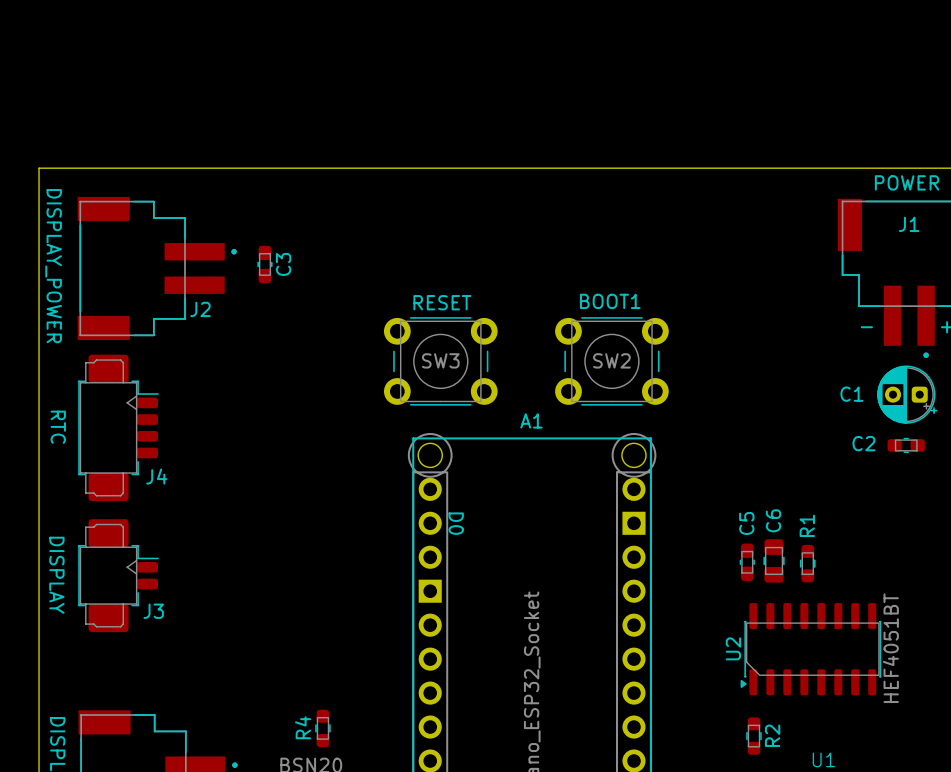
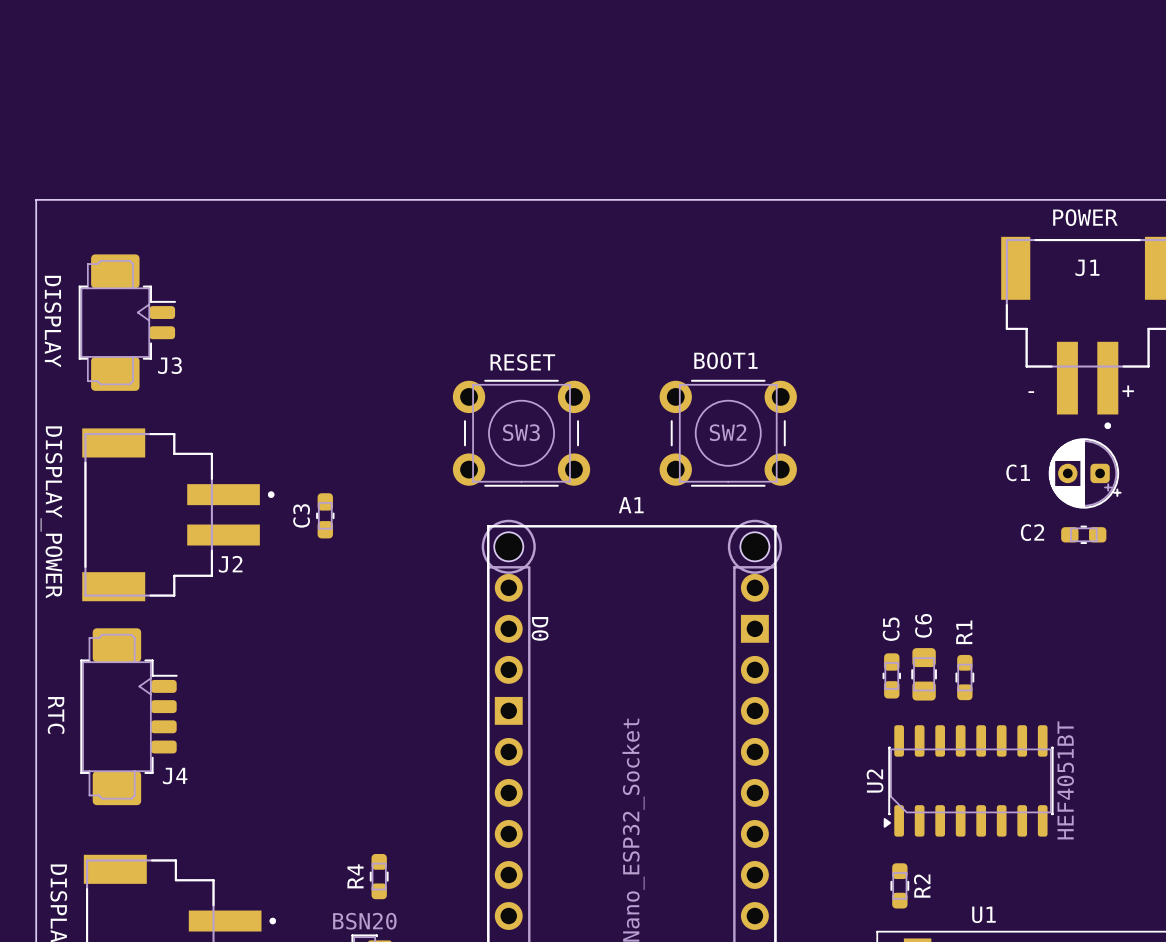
C3 position: (264, 264) -> (325, 515)
C3 name position: C3 (283, 264) -> C3 (301, 515)
J2 position: (157, 268) -> (178, 514)
J4 position: (118, 427) -> (128, 716)
J3 position: (118, 575) -> (127, 322)

